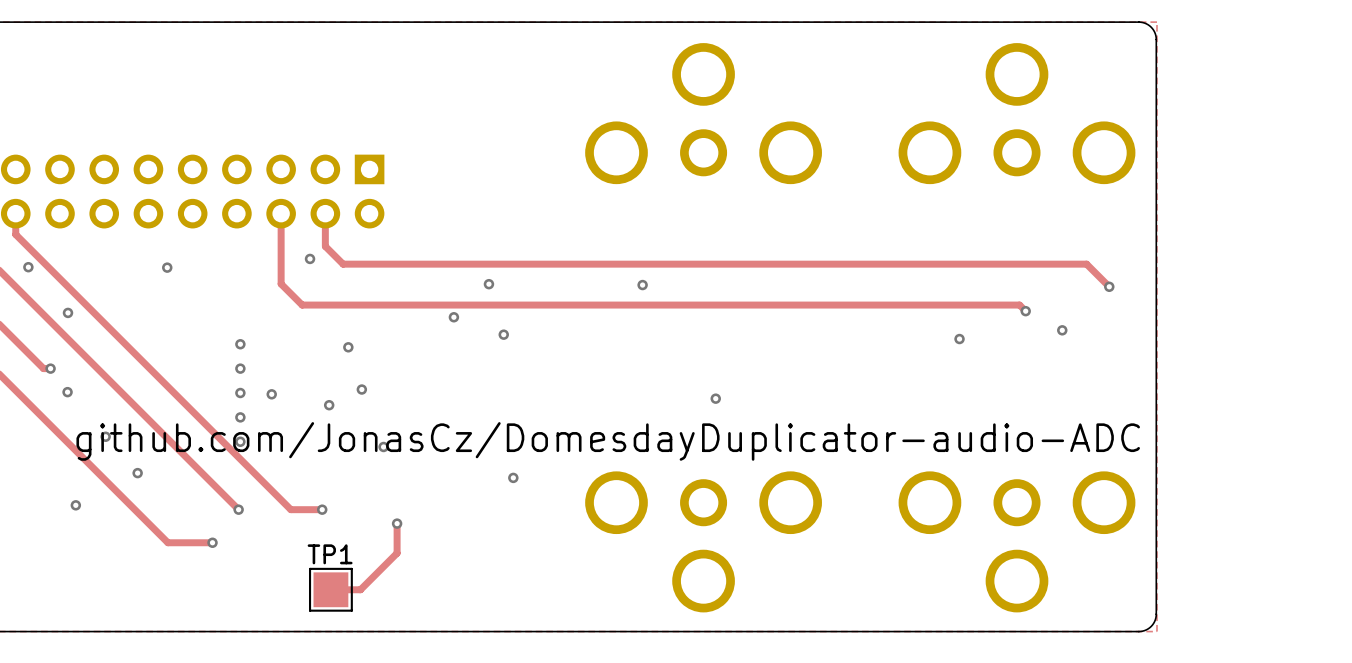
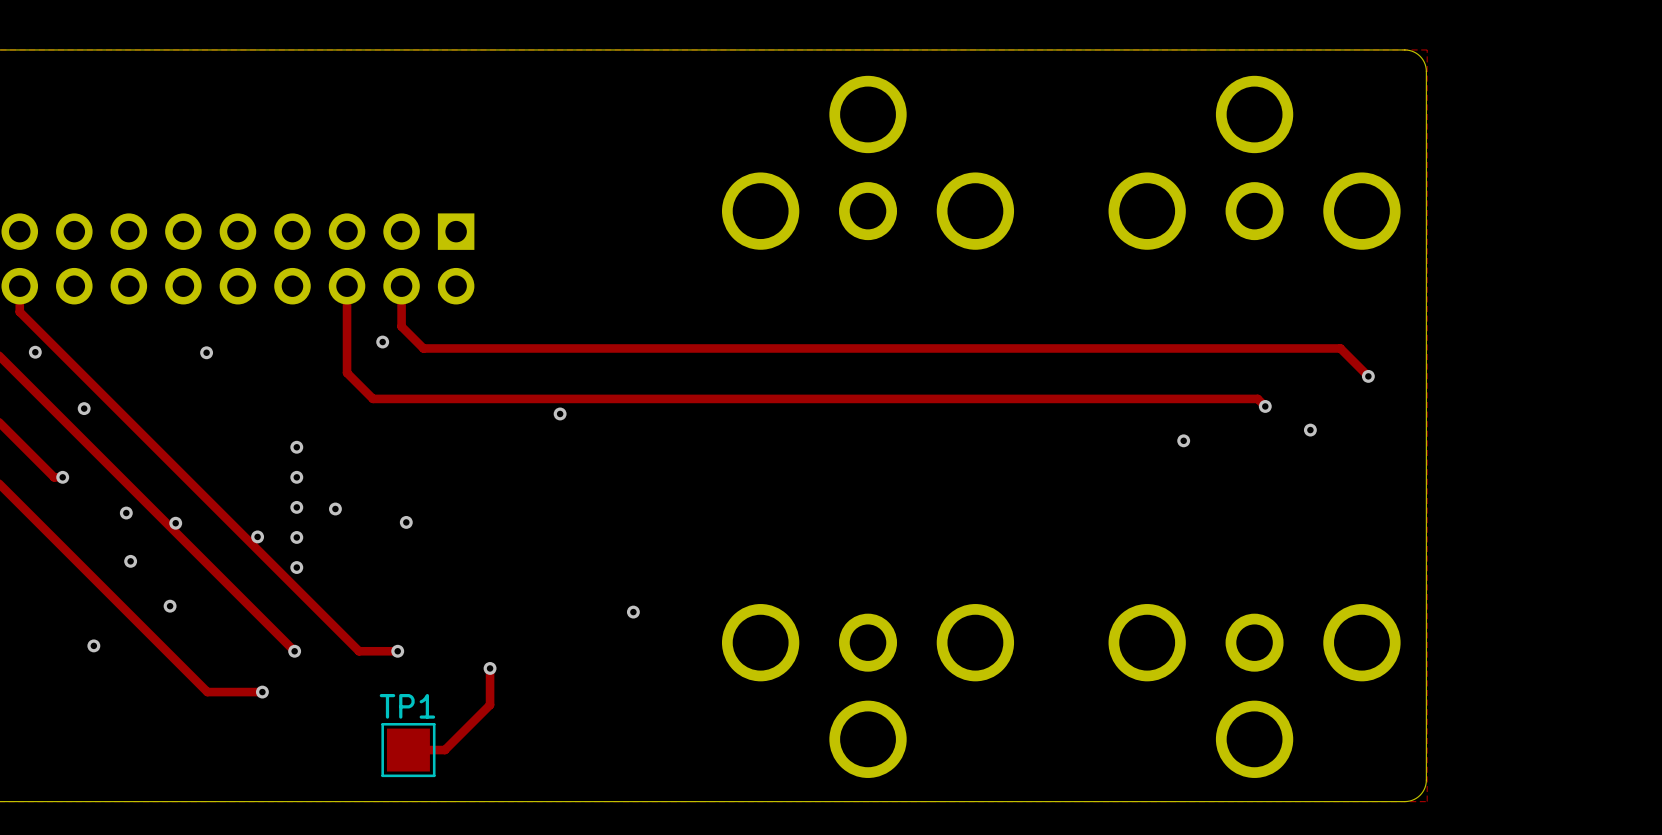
via: (488, 284) -> none
via: (642, 285) -> none
via: (503, 334) -> none
via: (348, 347) -> none
via: (361, 389) -> none
via position: (67, 392) -> (126, 513)
via: (715, 398) -> none
via: none -> (175, 523)
via: none -> (257, 536)
text: github.com/JonasCz/DomesdayDuplicator-audio-ADC (608, 441) -> none
via: (383, 446) -> none

